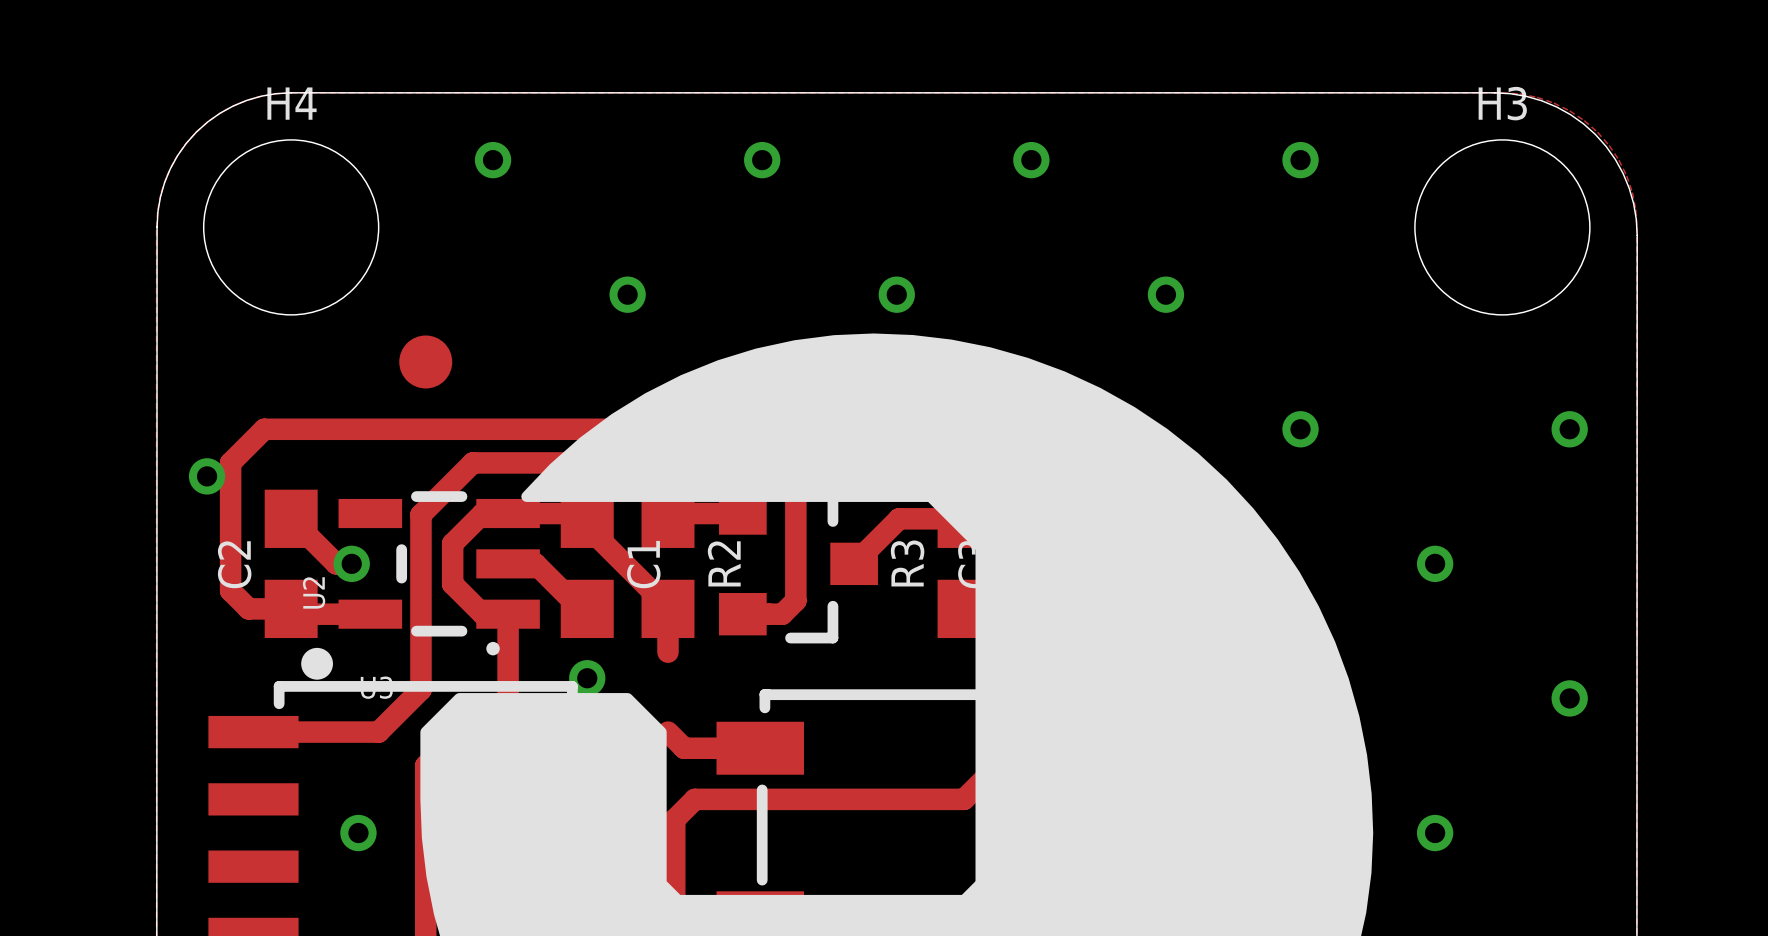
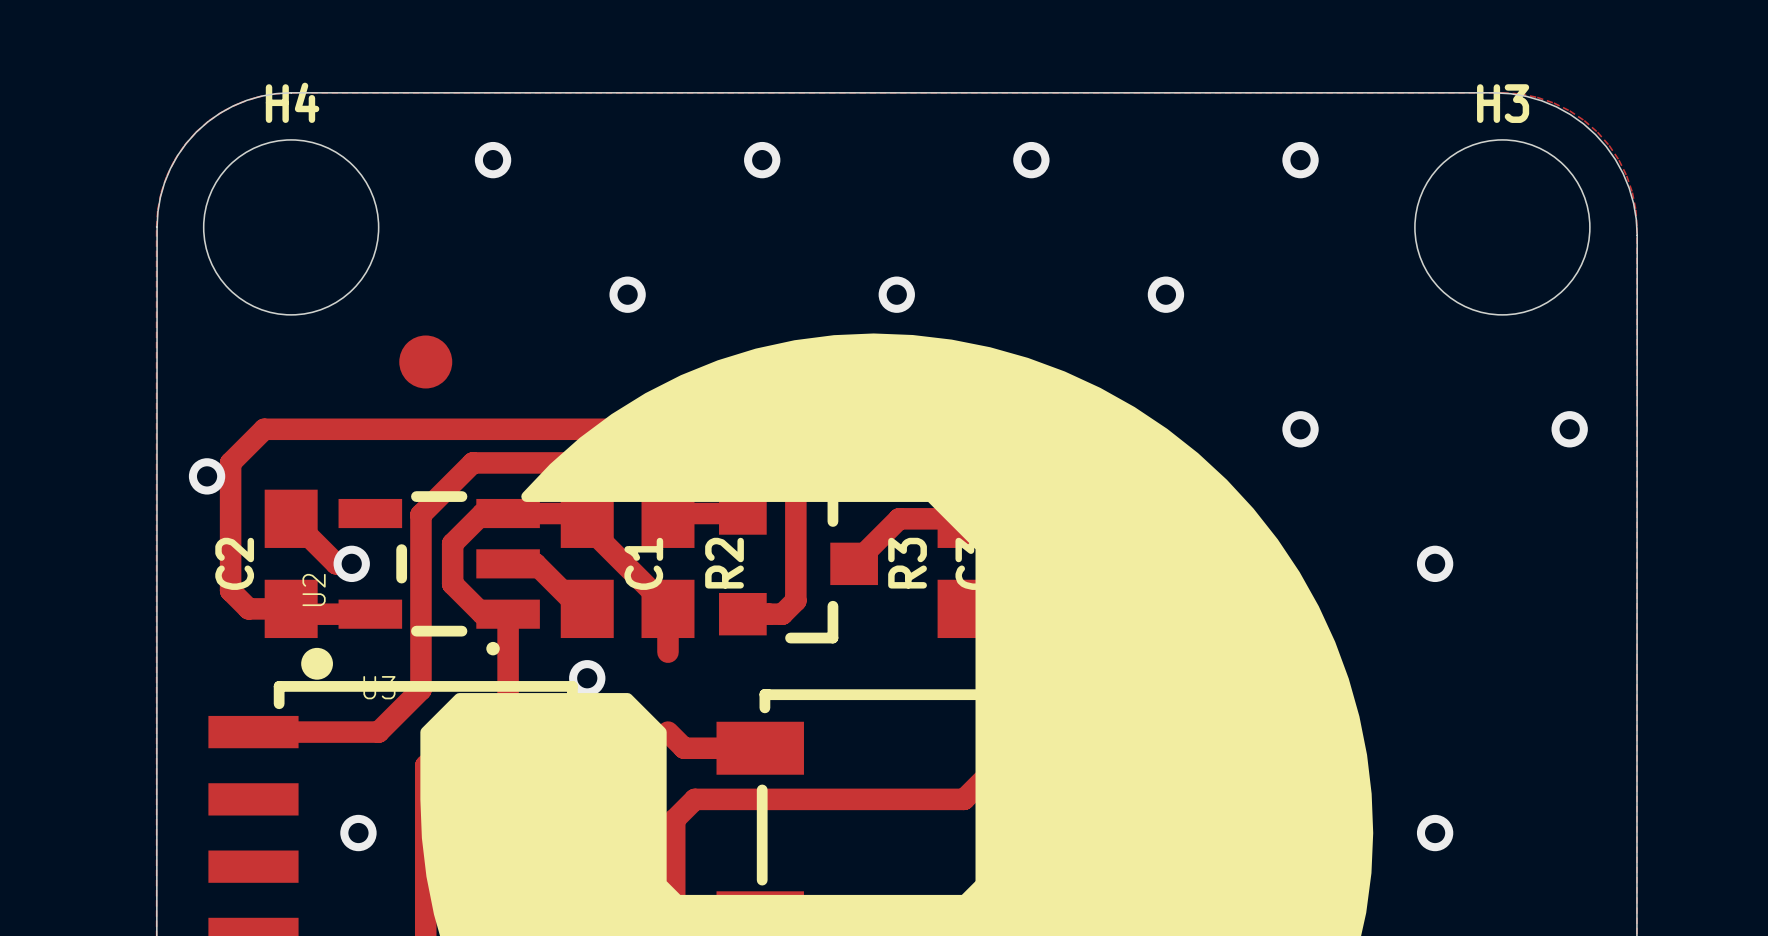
via: (1569, 698) -> none

